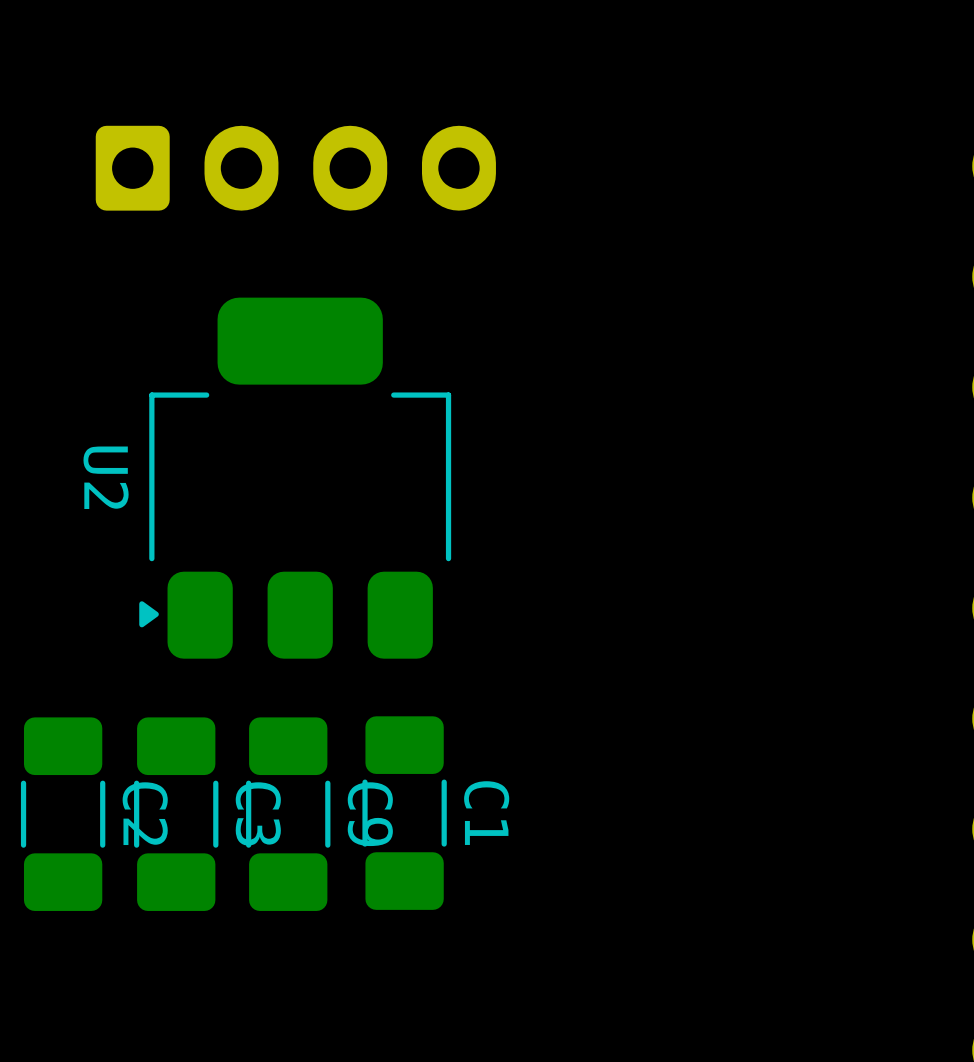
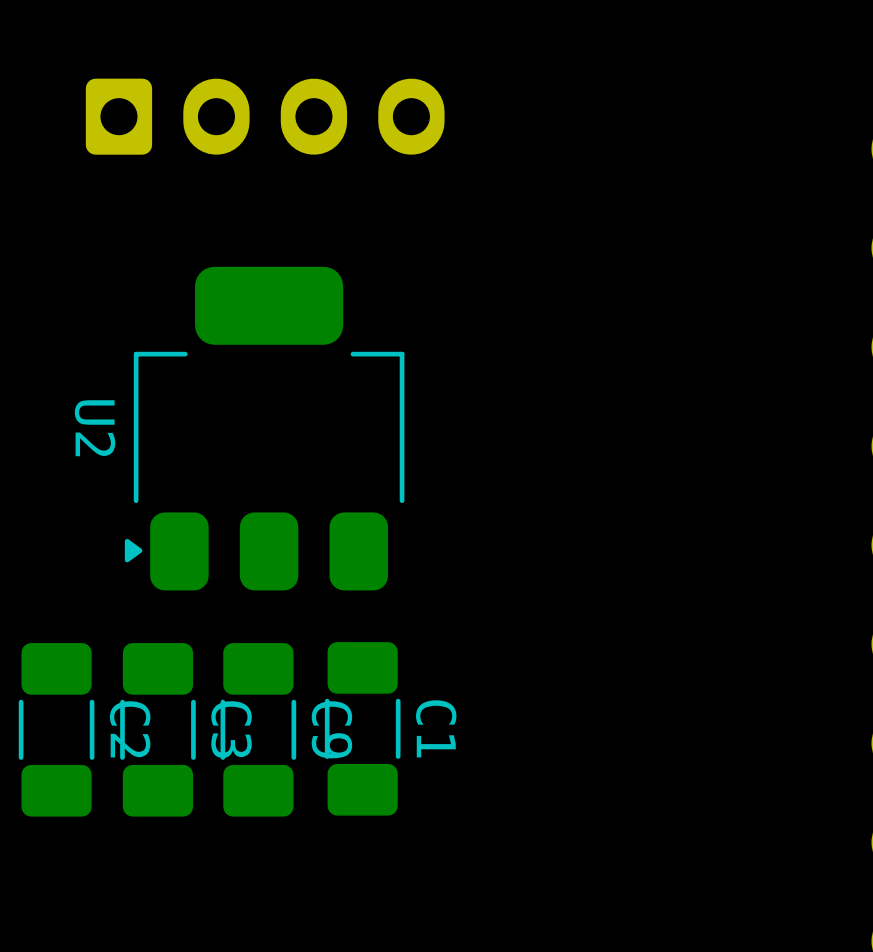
part position: (295, 168) -> (265, 116)

